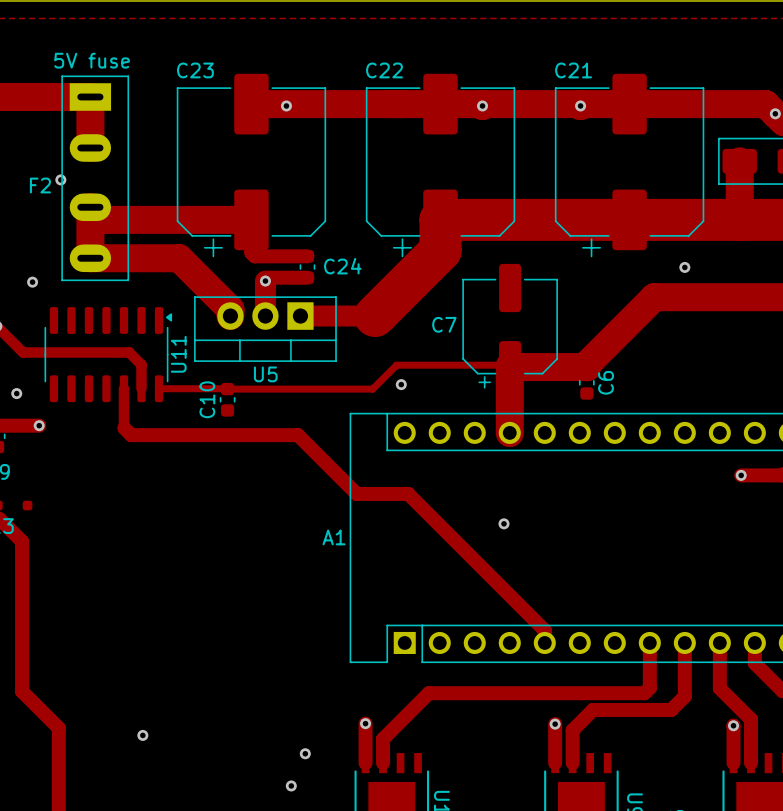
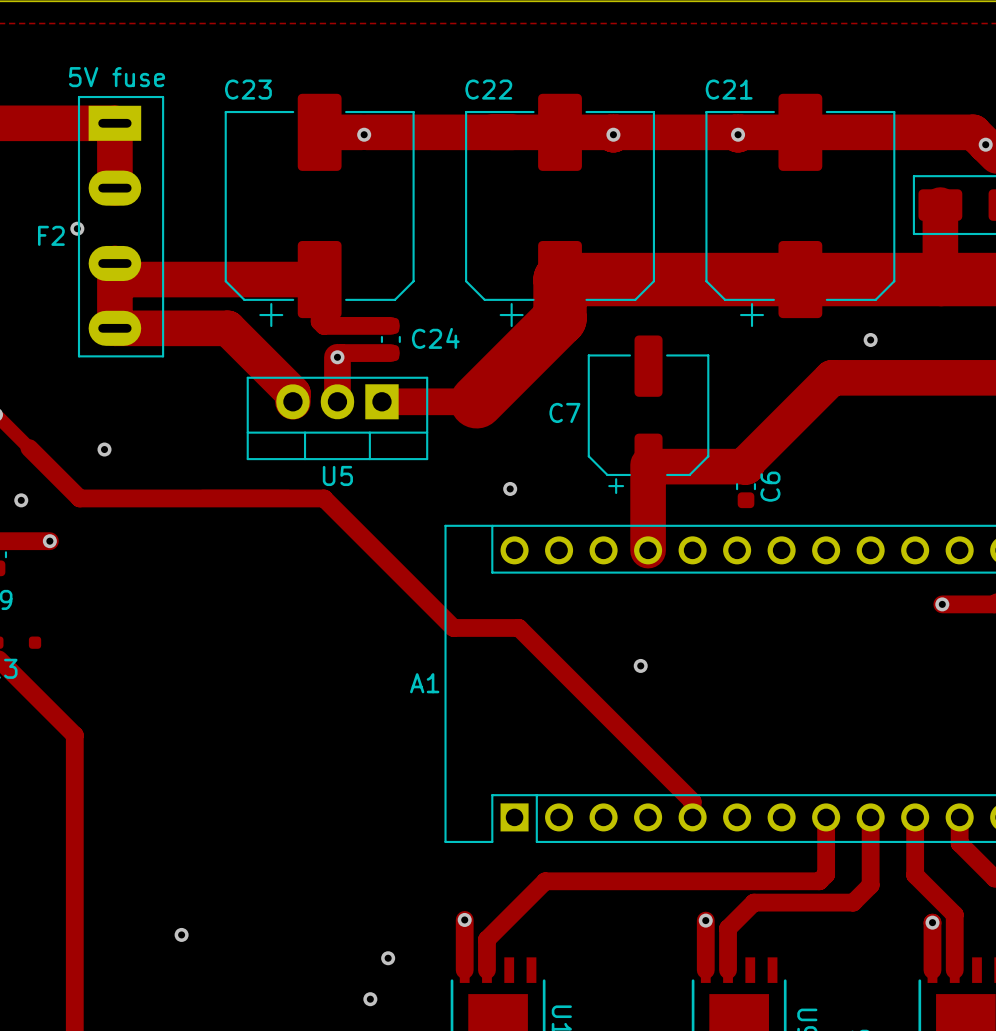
via: (32, 282) -> none
track: (23, 352) (129, 352) (141, 364) (141, 388) -> none
via: none -> (104, 449)
U11: (108, 354) -> none
track: (510, 365) (396, 365) (372, 389) (227, 389) -> none
track: (123, 388) (123, 427) (131, 435) (297, 435) -> (29, 448) (79, 498) (324, 498) (378, 553)
C10: (227, 399) -> none
track: (22, 541) (22, 691) (58, 728) -> (28, 688) (74, 735) (74, 925)

